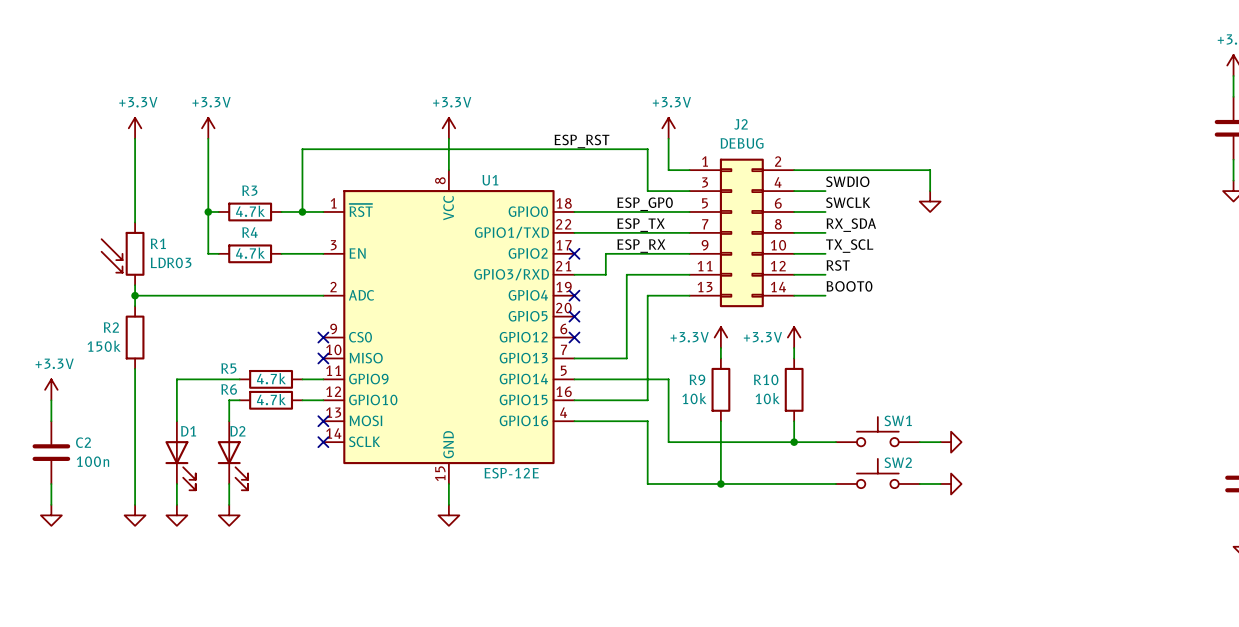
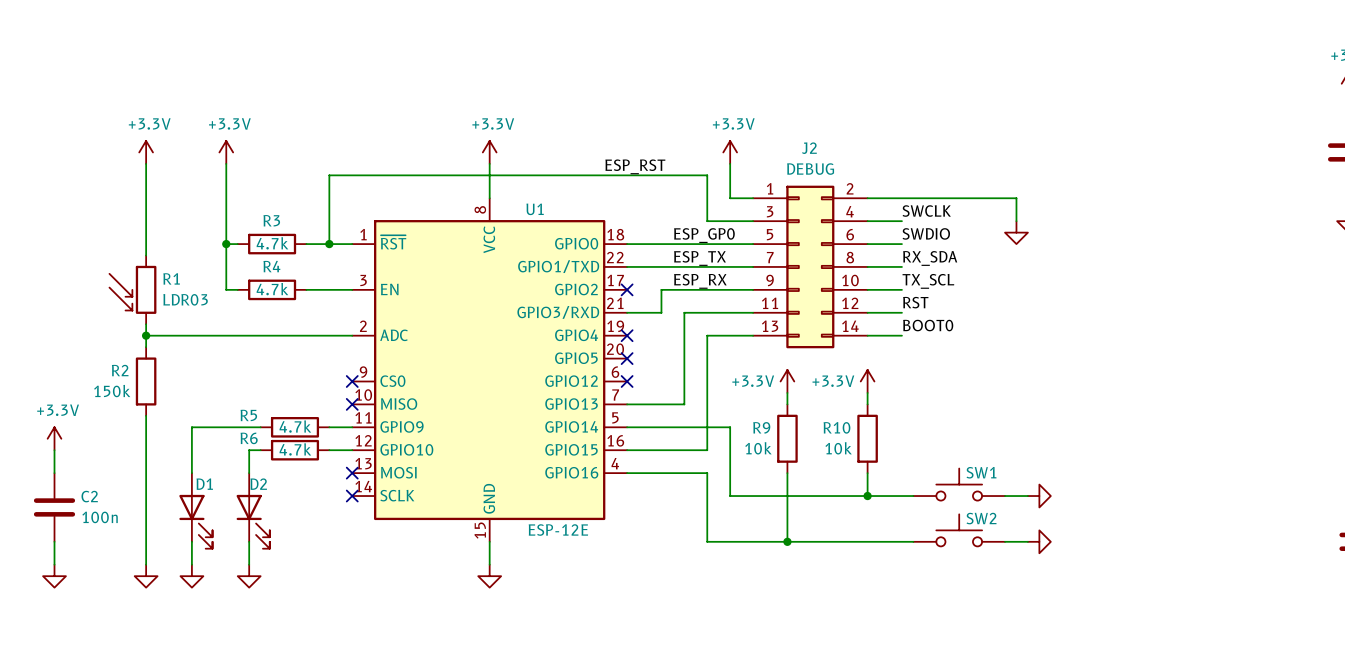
label: SWDIO (847, 181) -> SWCLK (926, 211)
label: SWCLK (848, 202) -> SWDIO (926, 233)

